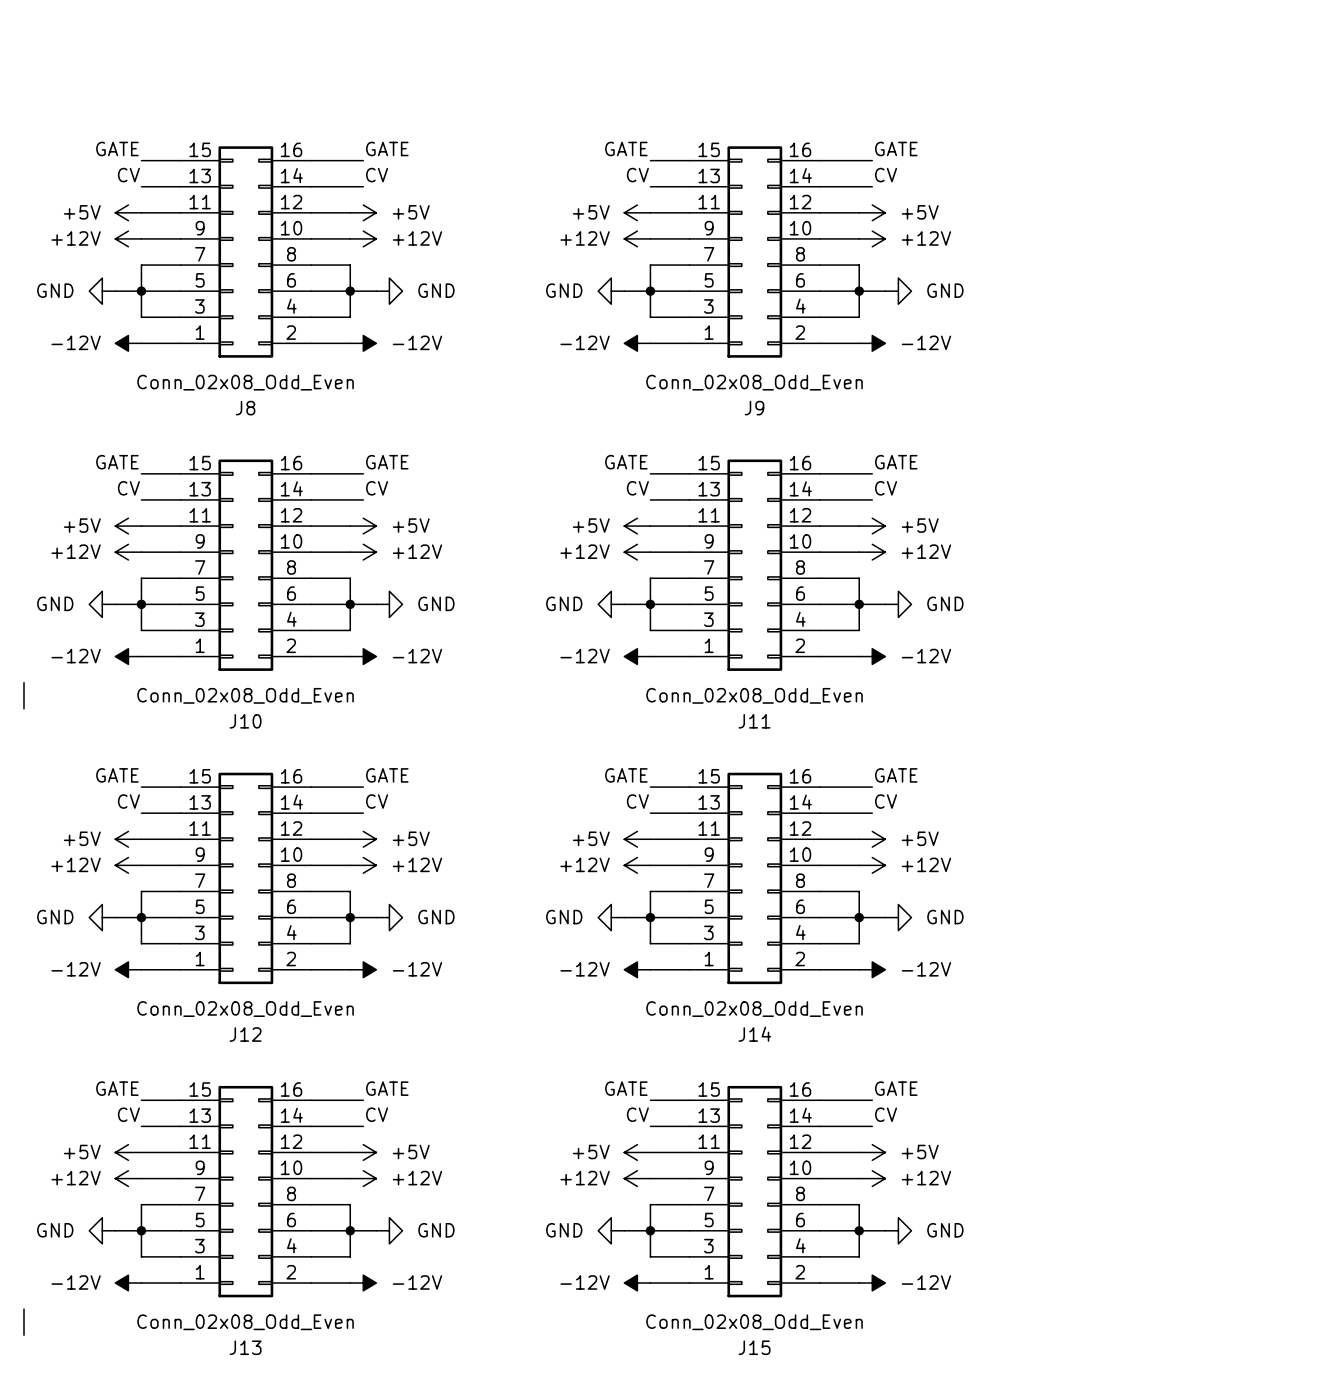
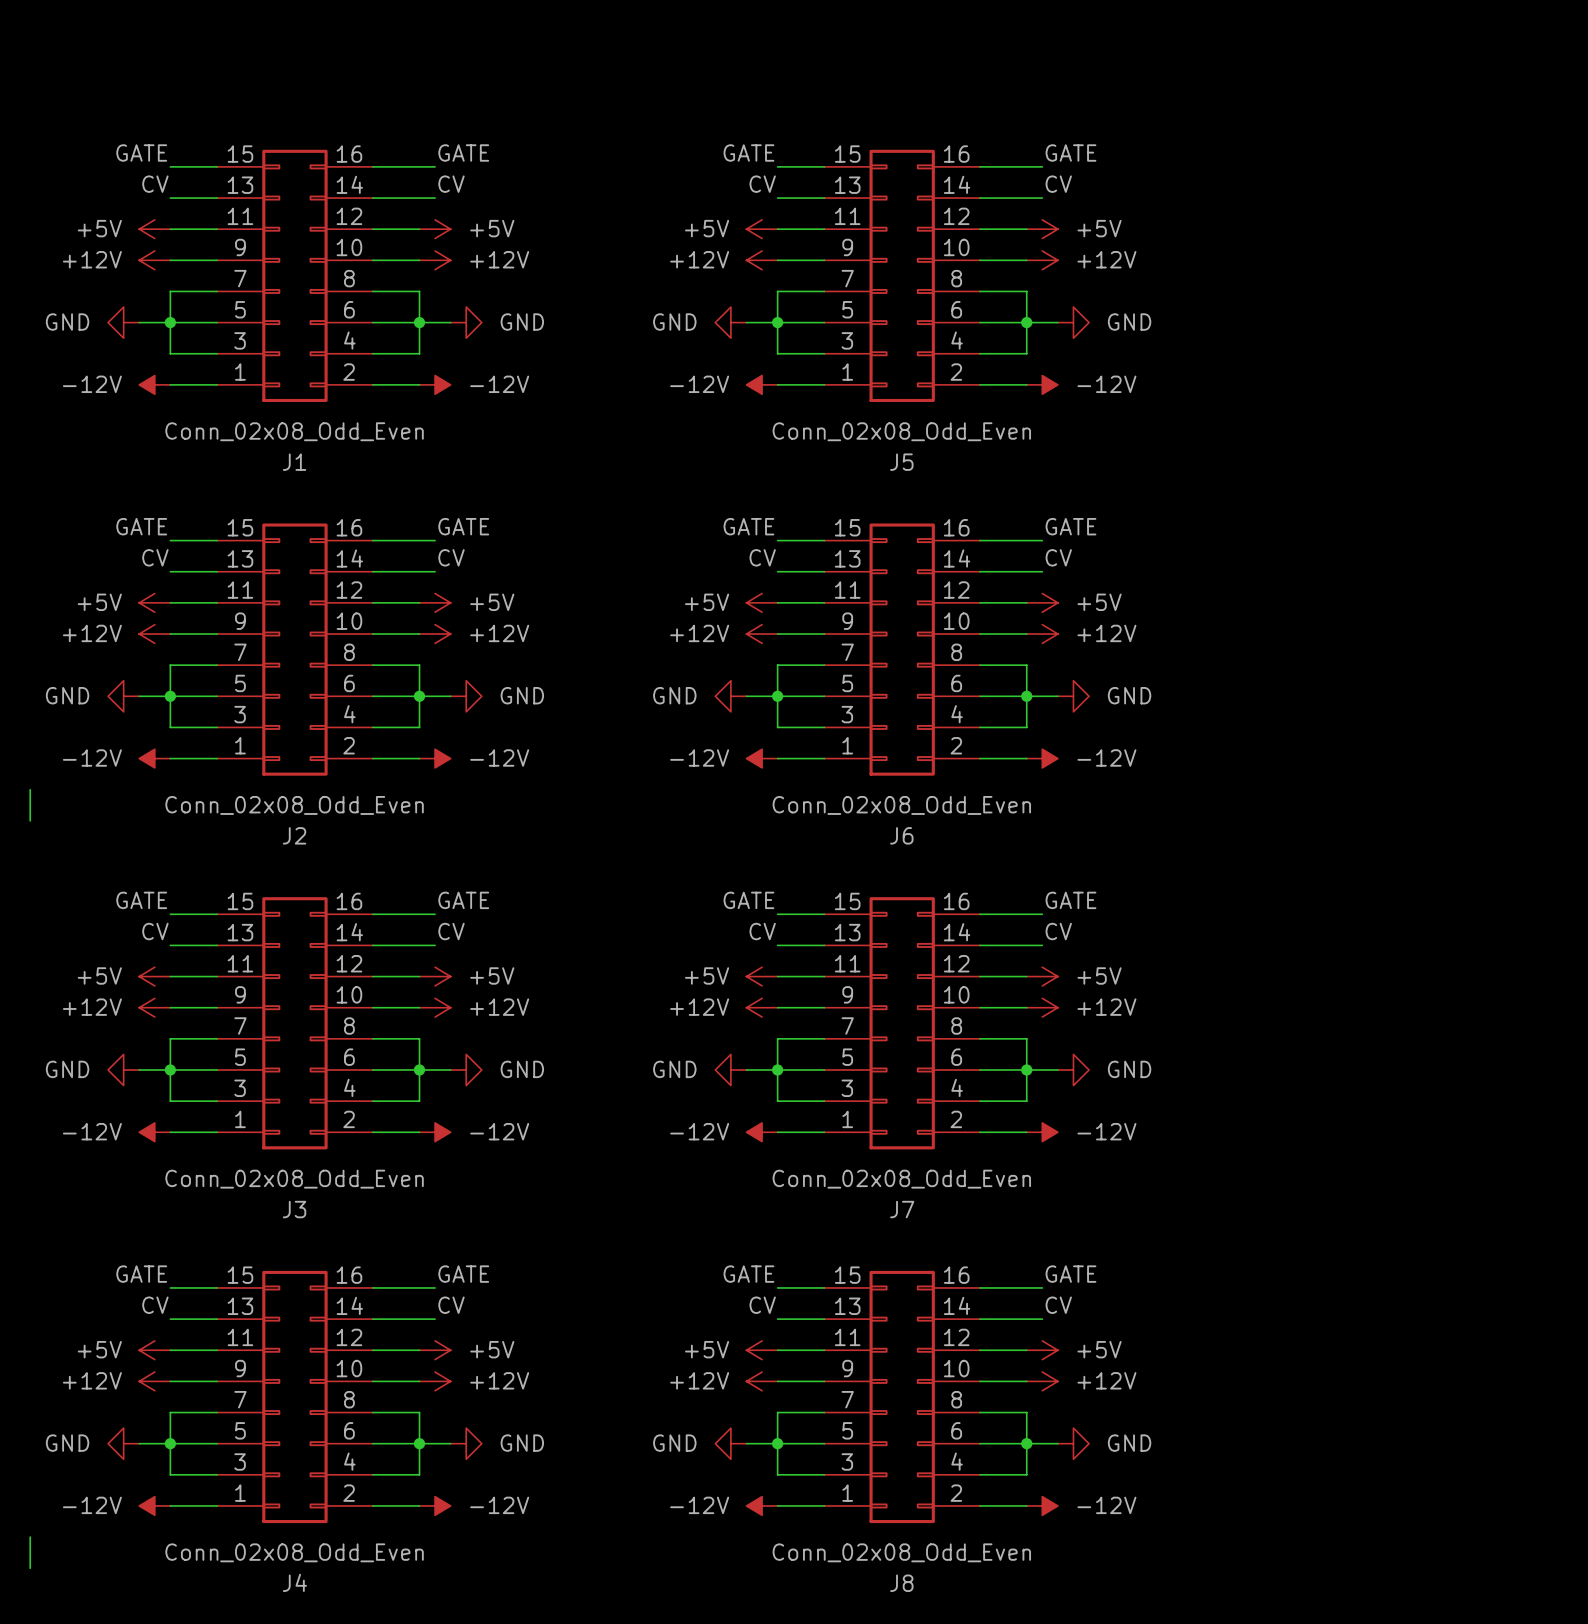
J8 name: J8 (245, 408) -> J1 (294, 462)
J9 name: J9 (754, 408) -> J5 (901, 462)
J10 name: J10 (245, 721) -> J2 (294, 835)
J11 name: J11 (754, 721) -> J6 (901, 835)
J12 name: J12 (245, 1034) -> J3 (294, 1209)
J14 name: J14 (754, 1034) -> J7 (902, 1209)
J13 name: J13 (245, 1347) -> J4 (294, 1582)
J15 name: J15 (754, 1347) -> J8 (901, 1583)

